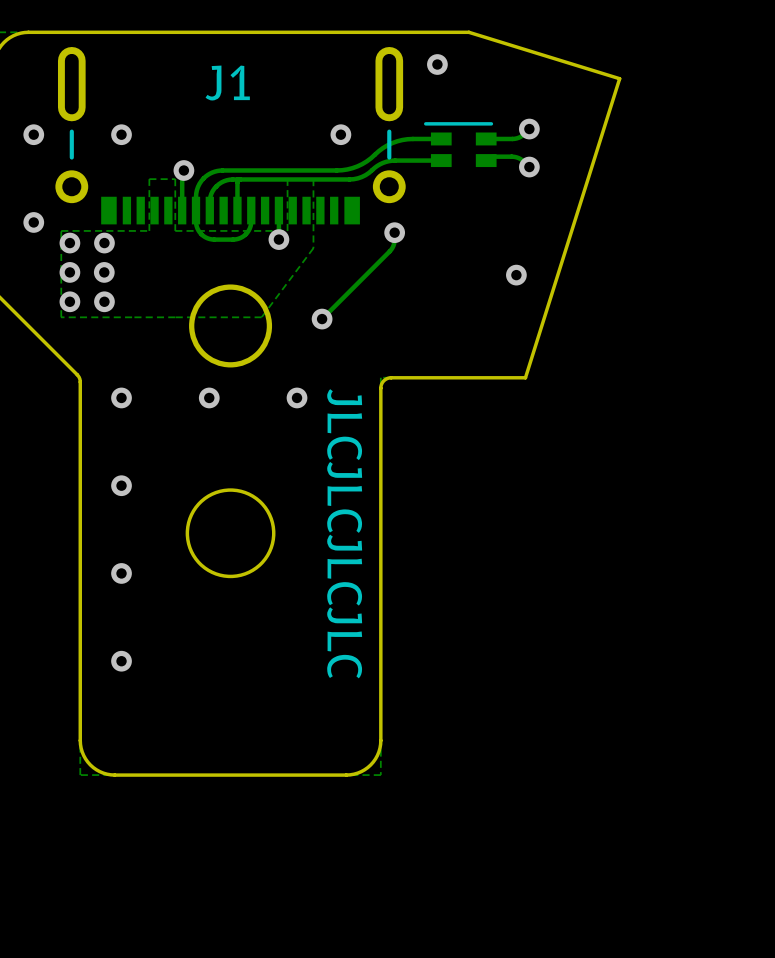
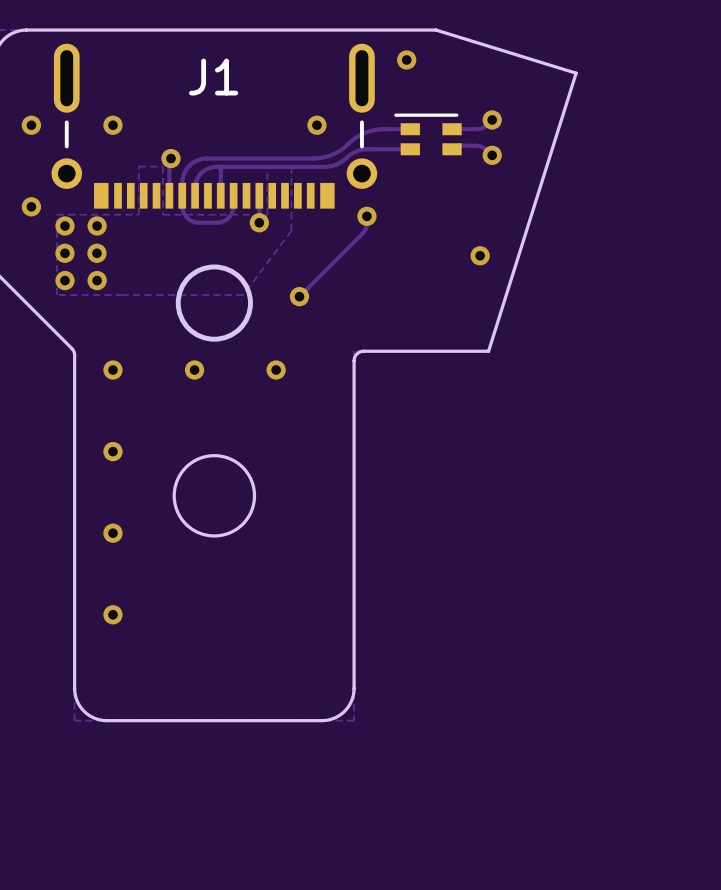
text: JLCJLCJLCJLC (344, 533) -> none

